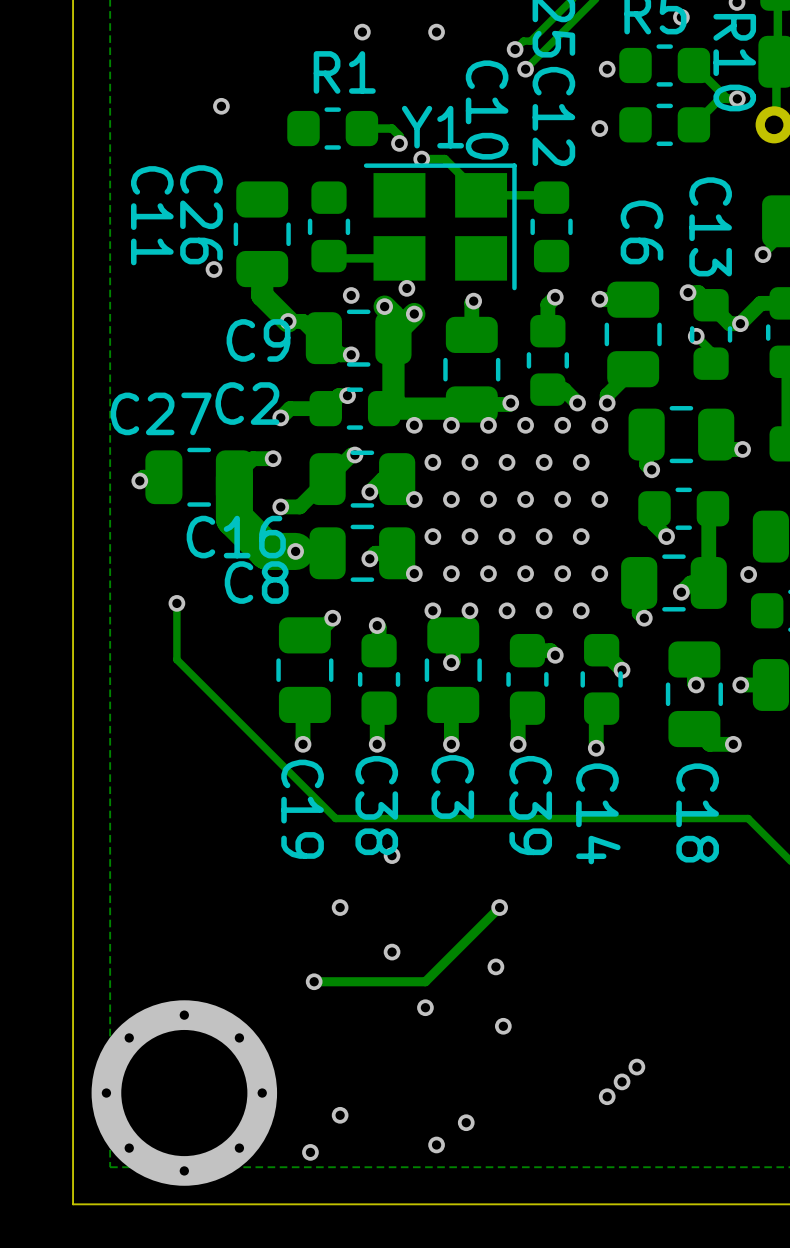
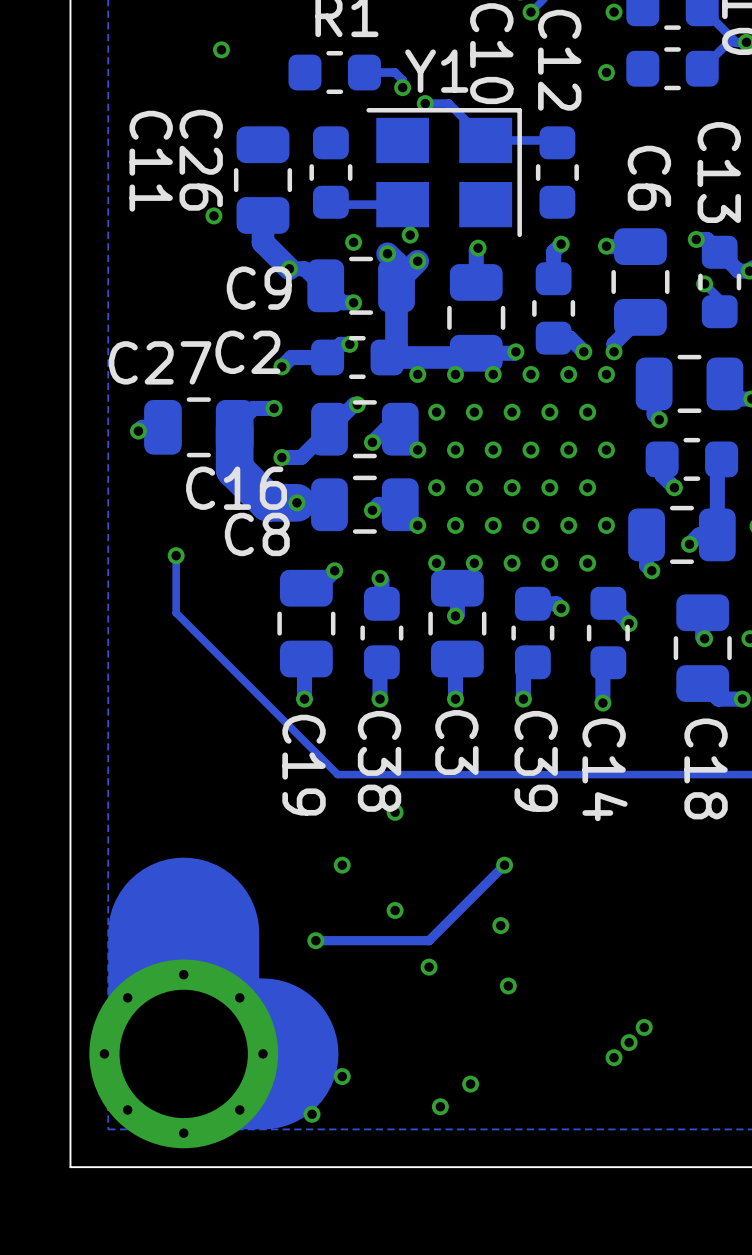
track: none -> (183, 933) (183, 1053) (262, 1053)

